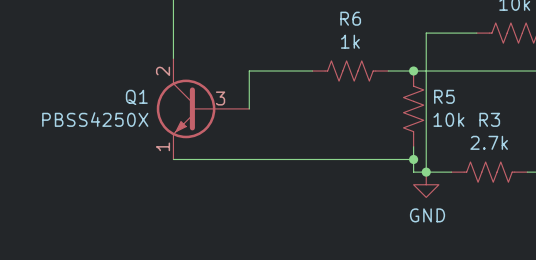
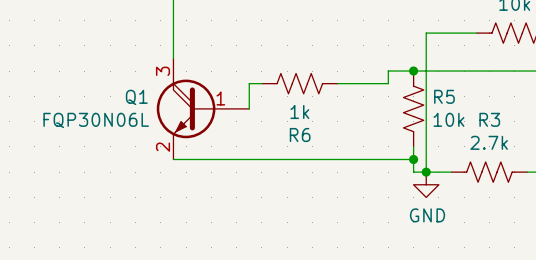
R6 name position: R6 (350, 18) -> R6 (300, 135)
R6 value position: 1k (350, 41) -> 1k (299, 111)
Q1 symbol: [156, 58, 250, 160] -> [156, 58, 250, 160]
wire: (312, 71) (249, 71) (249, 83) -> (261, 83) (249, 83)
R6 position: (350, 71) -> (299, 83)
wire: none -> (388, 71) (388, 83) (337, 83)
Q1 value: PBSS4250X (95, 119) -> FQP30N06L (96, 120)

